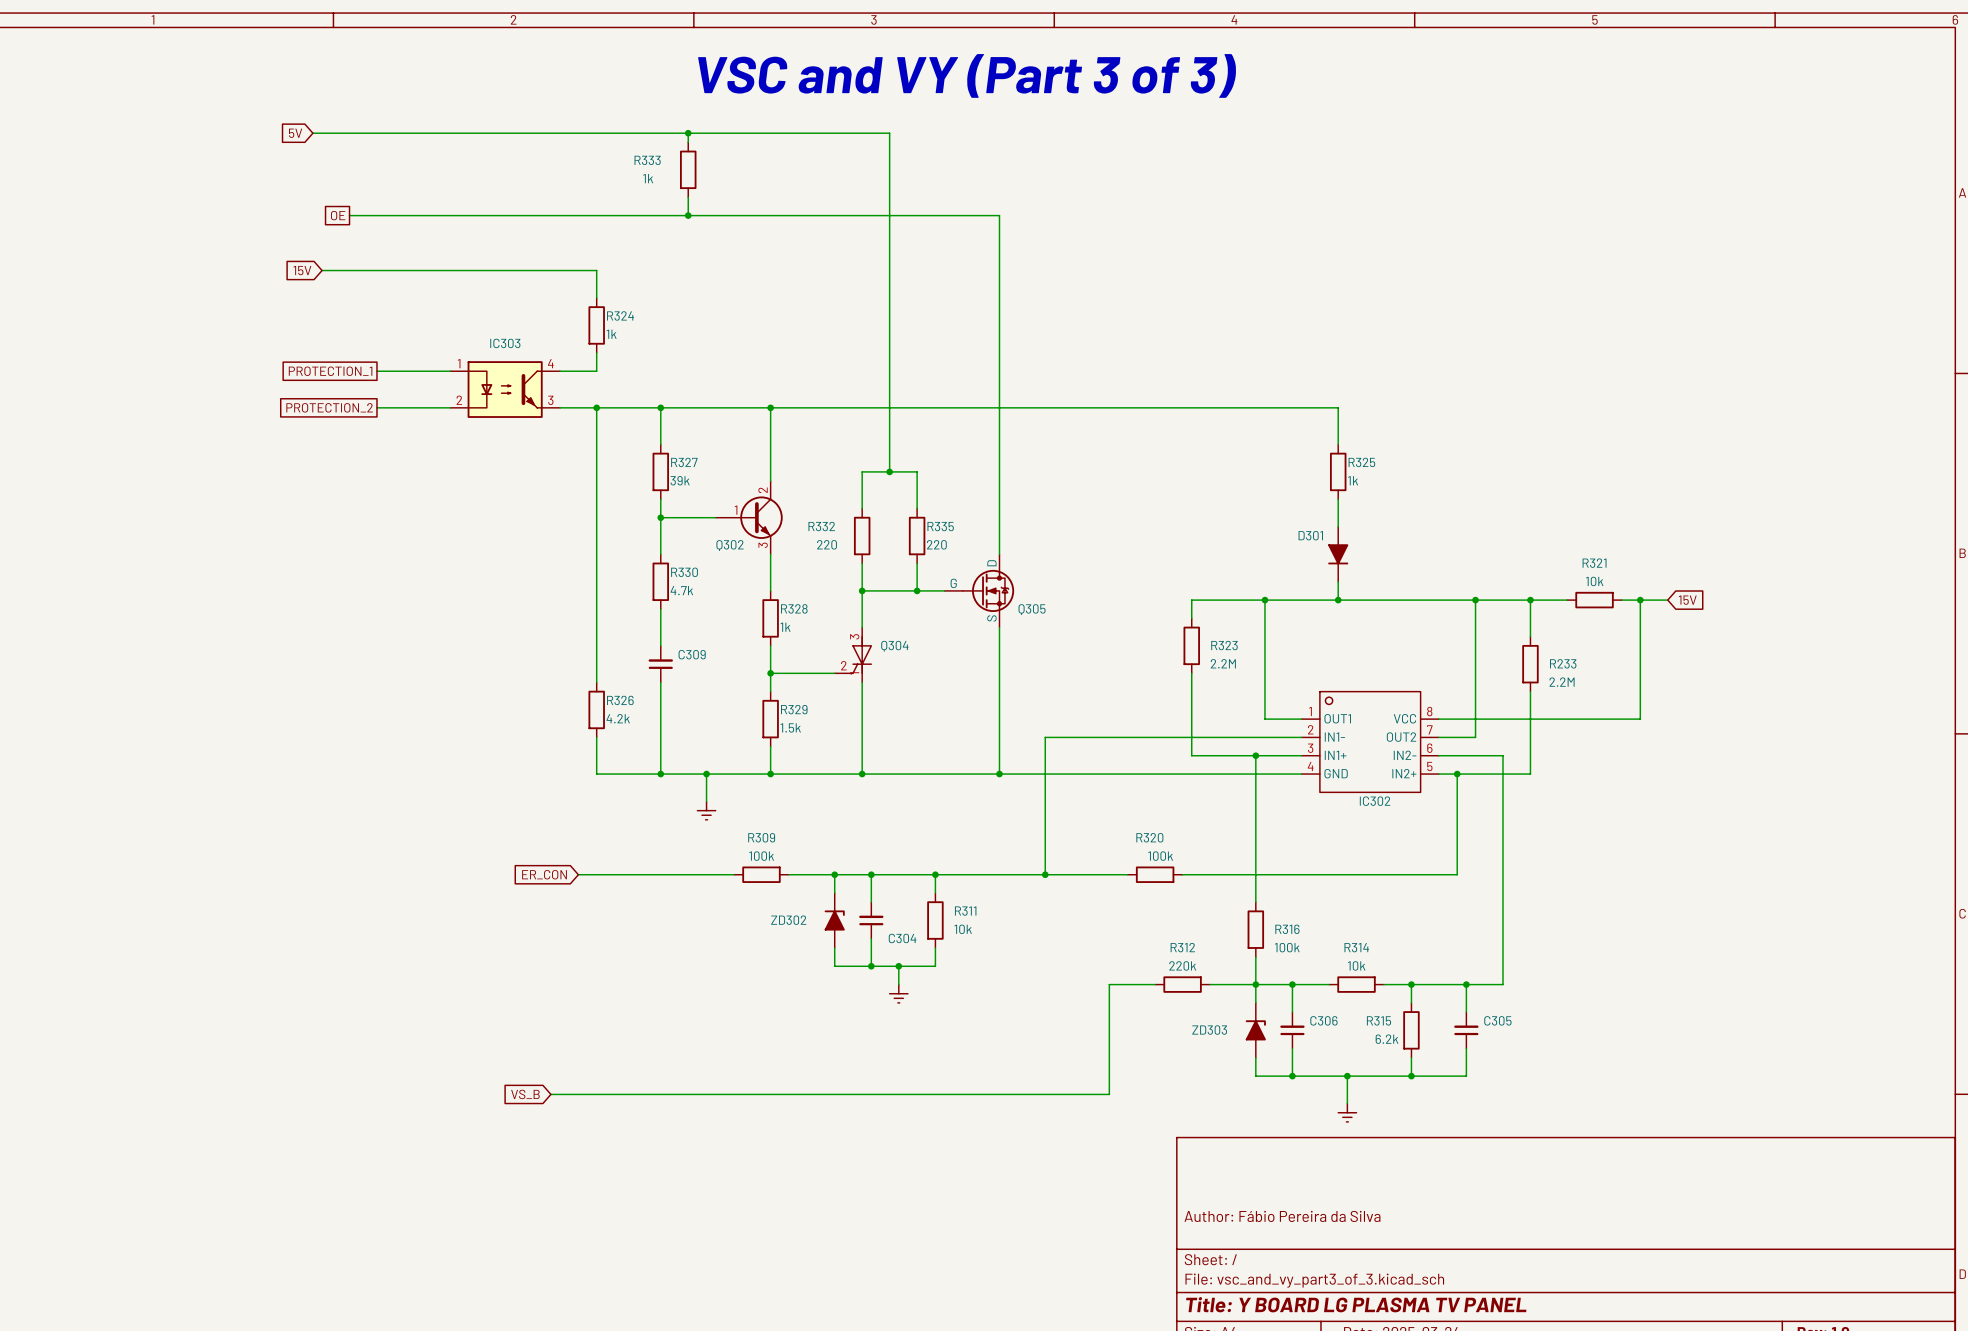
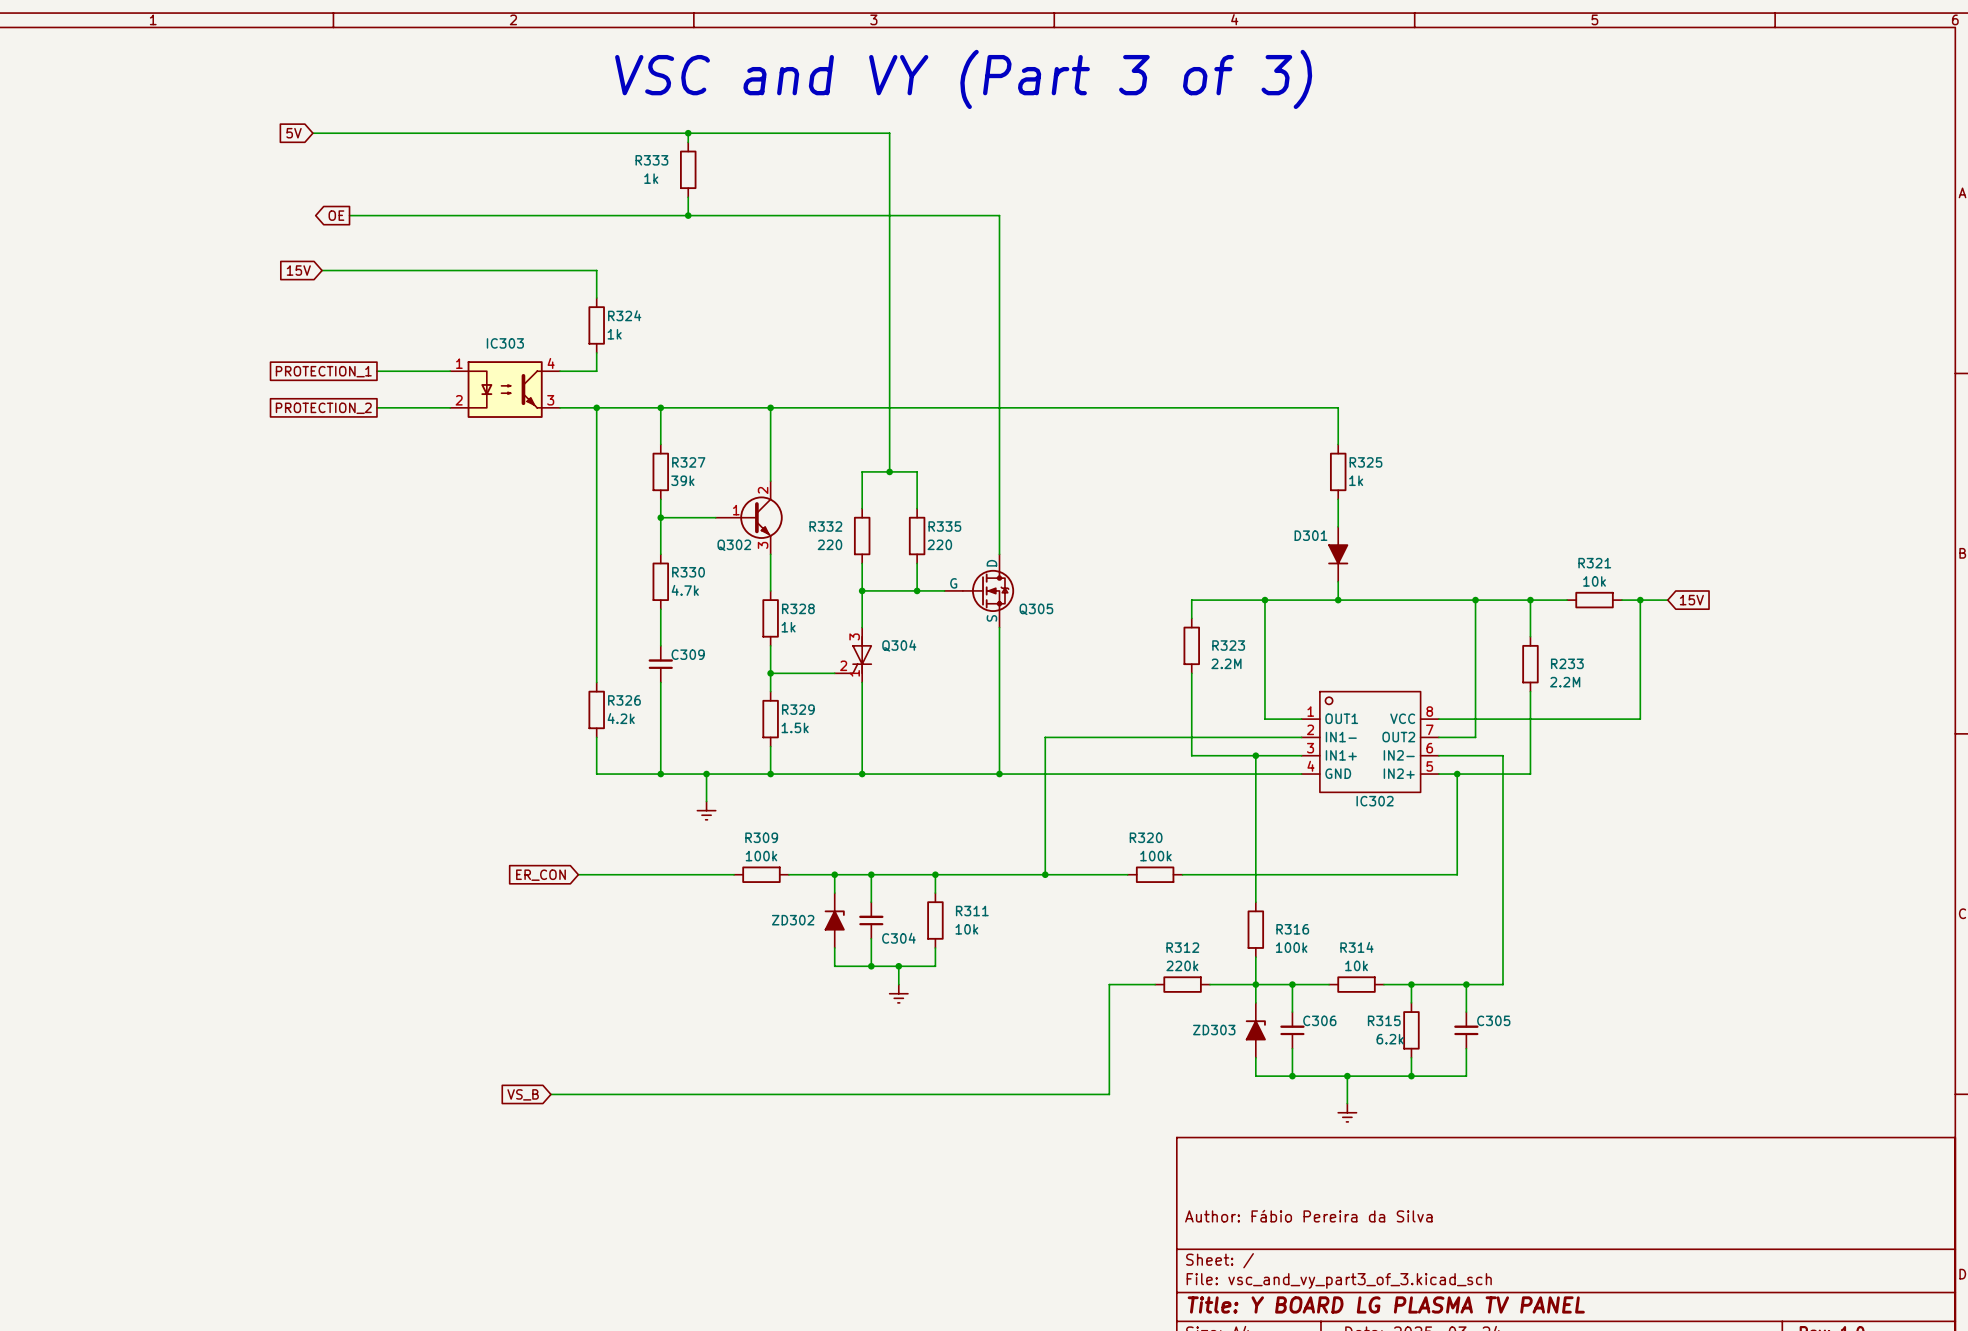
global label shape: passive (338, 215) -> output (336, 215)

